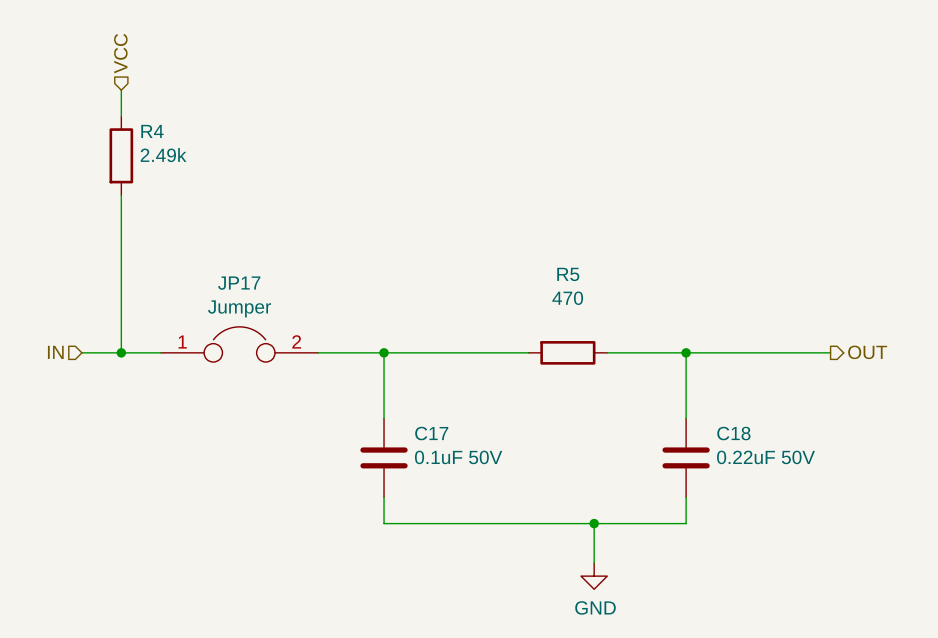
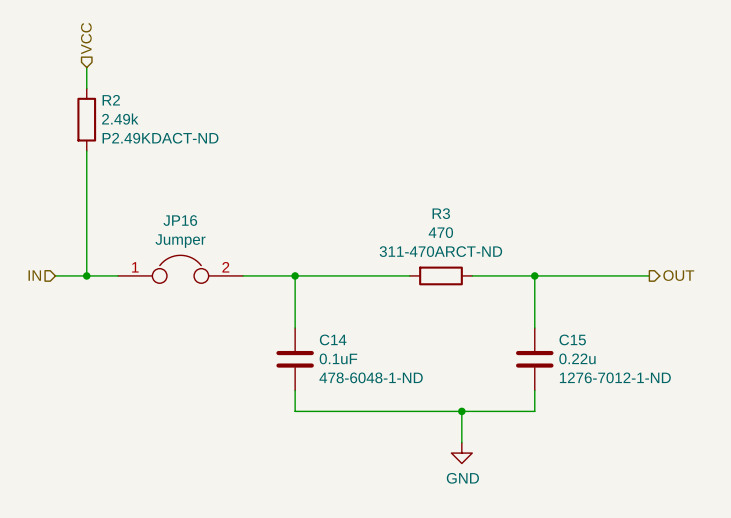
R4 name: R4 (152, 131) -> R2 (111, 100)
R4 text: none -> P2.49KDACT-ND (160, 138)
R5 name: R5 (568, 274) -> R3 (441, 213)
JP17 name: JP17 (239, 283) -> JP16 (180, 220)
R5 text: none -> 311-470ARCT-ND (440, 251)
C17 name: C17 (431, 433) -> C14 (333, 339)
C18 name: C18 (733, 433) -> C15 (572, 339)
C17 value: 0.1uF 50V (458, 457) -> 0.1uF (338, 358)
C18 value: 0.22uF 50V (765, 457) -> 0.22u (577, 358)
C17 text: none -> 478-6048-1-ND (371, 377)
C18 text: none -> 1276-7012-1-ND (615, 377)

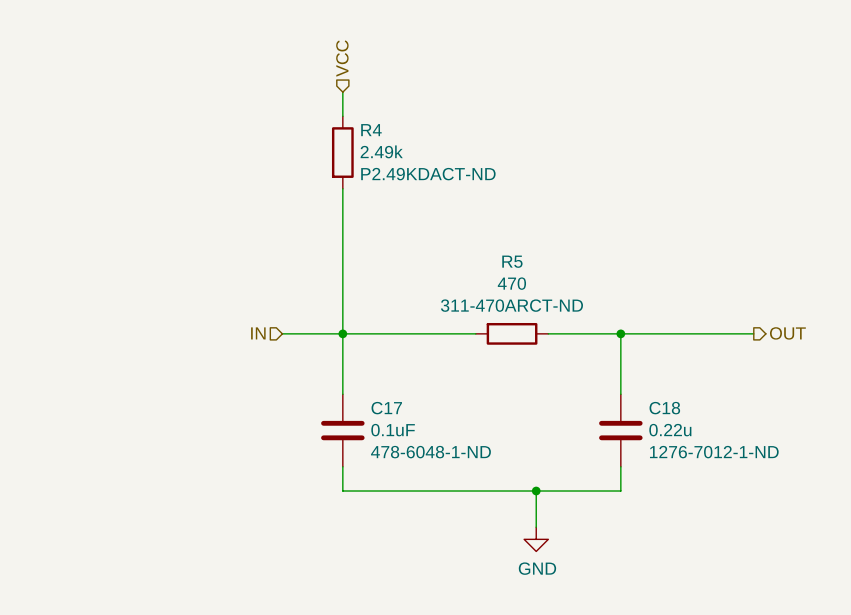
hierarchical label: VCC (86, 38) -> none
hierarchical label: none -> VCC (342, 58)
wire: (86, 67) (86, 88) -> none
wire: none -> (342, 92) (342, 116)
R2: 2.49k (86, 119) -> none
R4: none -> 2.49k (342, 152)
wire: (86, 150) (86, 275) -> none
wire: none -> (342, 188) (342, 333)
R3 name: R3 (441, 213) -> R5 (512, 261)
JP16: Jumper (180, 269) -> none
hierarchical label position: IN (34, 275) -> IN (258, 333)
wire: (55, 275) (118, 275) -> none
junction: (86, 275) -> none
C14 name: C14 (333, 339) -> C17 (386, 408)
C15 name: C15 (572, 339) -> C18 (664, 408)

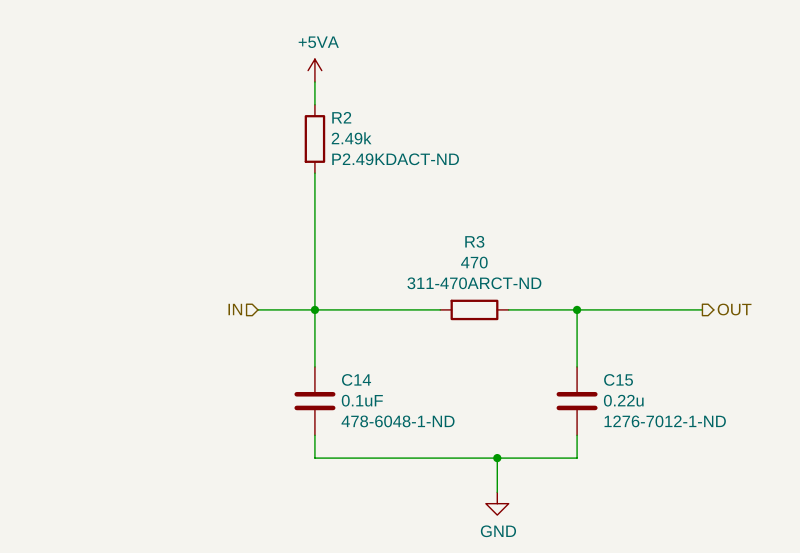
hierarchical label: VCC (342, 58) -> none
power symbol: none -> +5VA (314, 70)
R4 name: R4 (371, 130) -> R2 (341, 117)
R5 name: R5 (512, 261) -> R3 (474, 241)
C17 name: C17 (386, 408) -> C14 (356, 379)
C18 name: C18 (664, 408) -> C15 (618, 379)

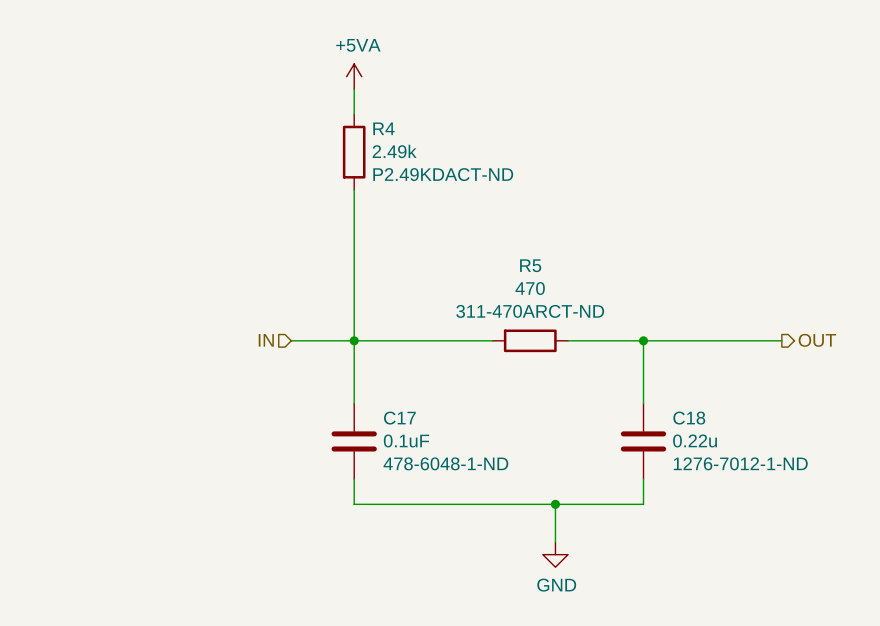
R2 name: R2 (341, 117) -> R4 (383, 128)
R3 name: R3 (474, 241) -> R5 (530, 265)
C14 name: C14 (356, 379) -> C17 (399, 418)
C15 name: C15 (618, 379) -> C18 (689, 418)

